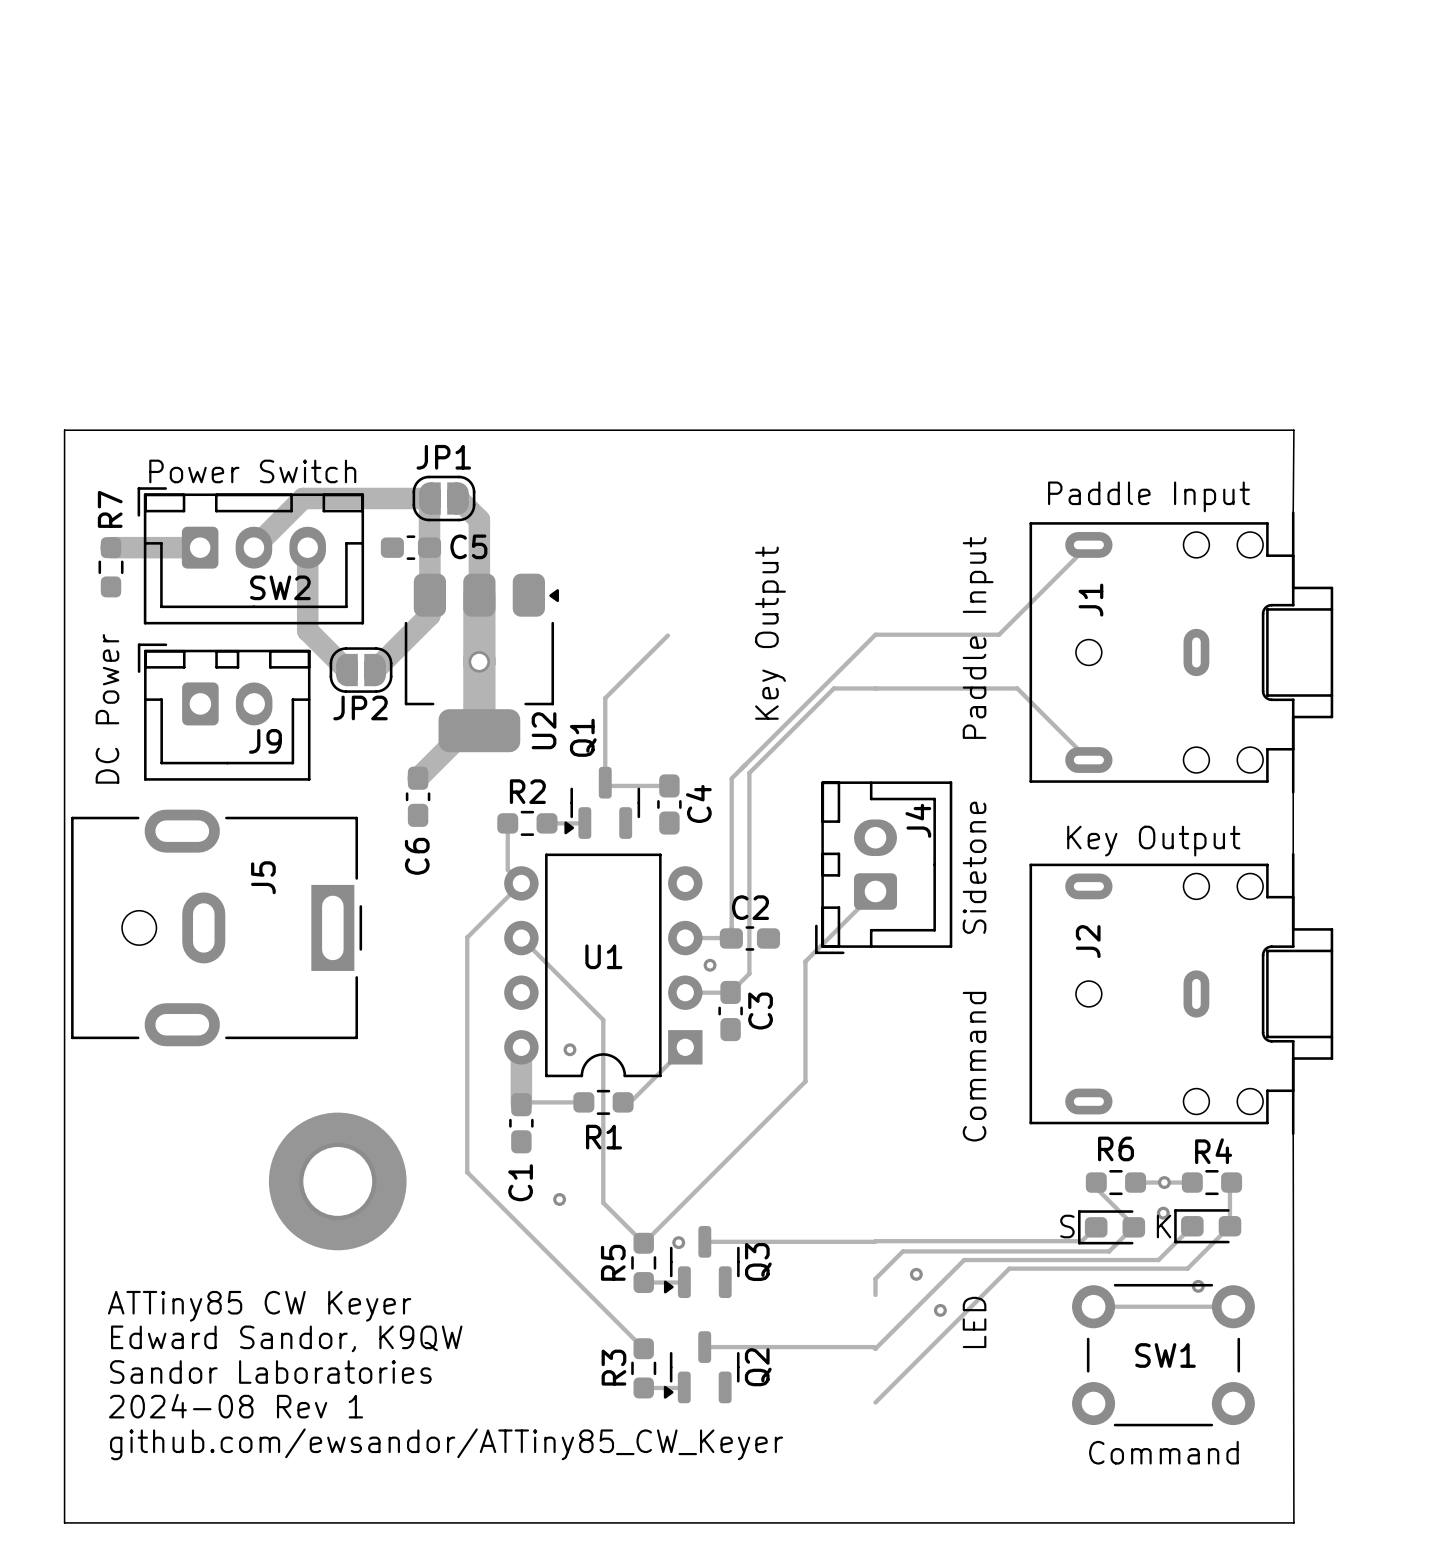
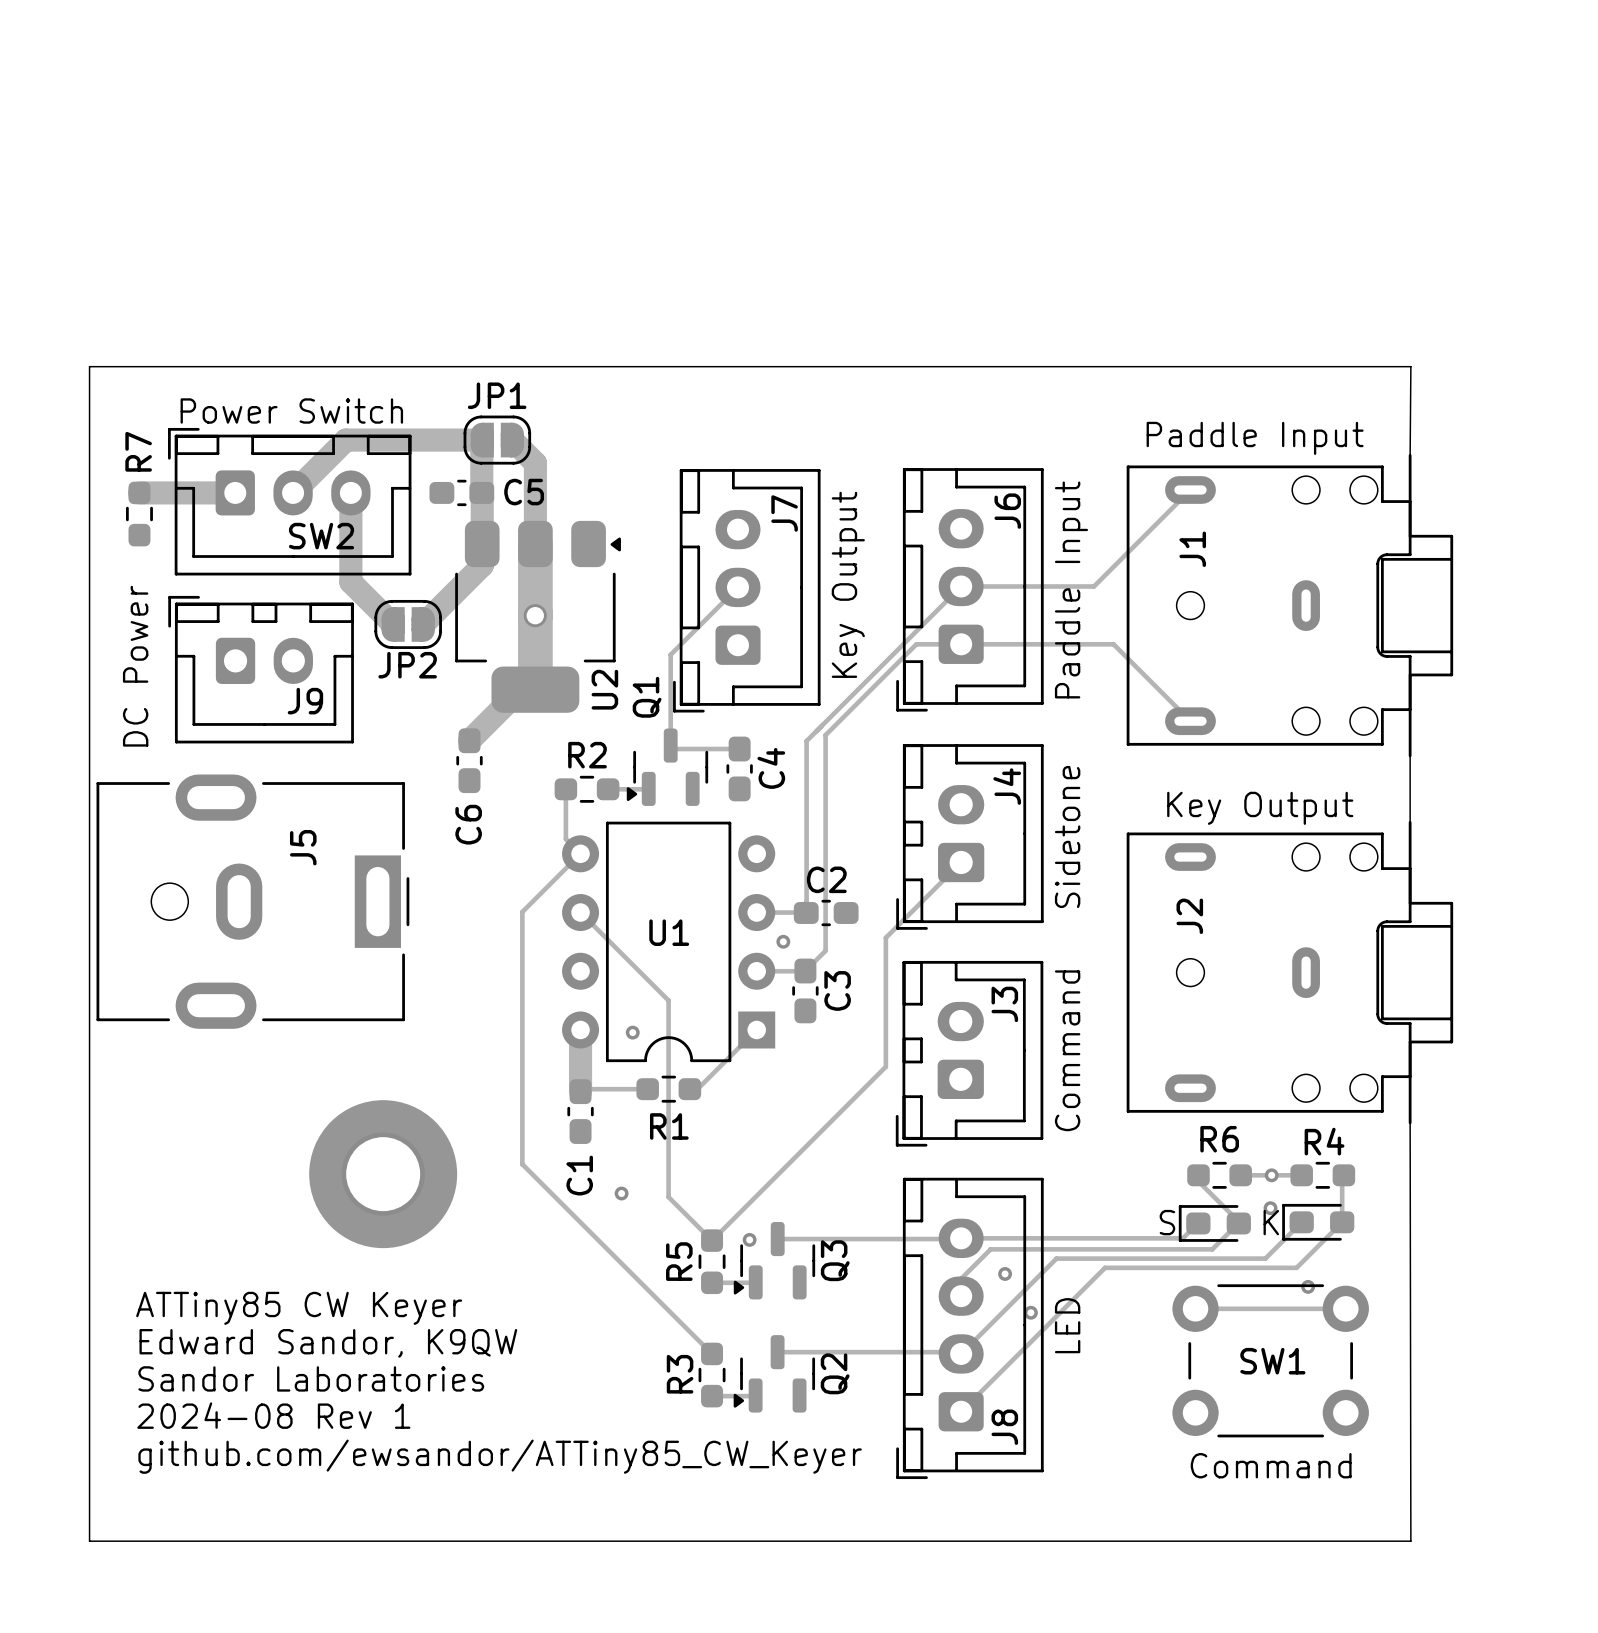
J6: none -> (969, 589)
J7: none -> (746, 590)
J3: none -> (969, 1053)
J8: none -> (969, 1328)

